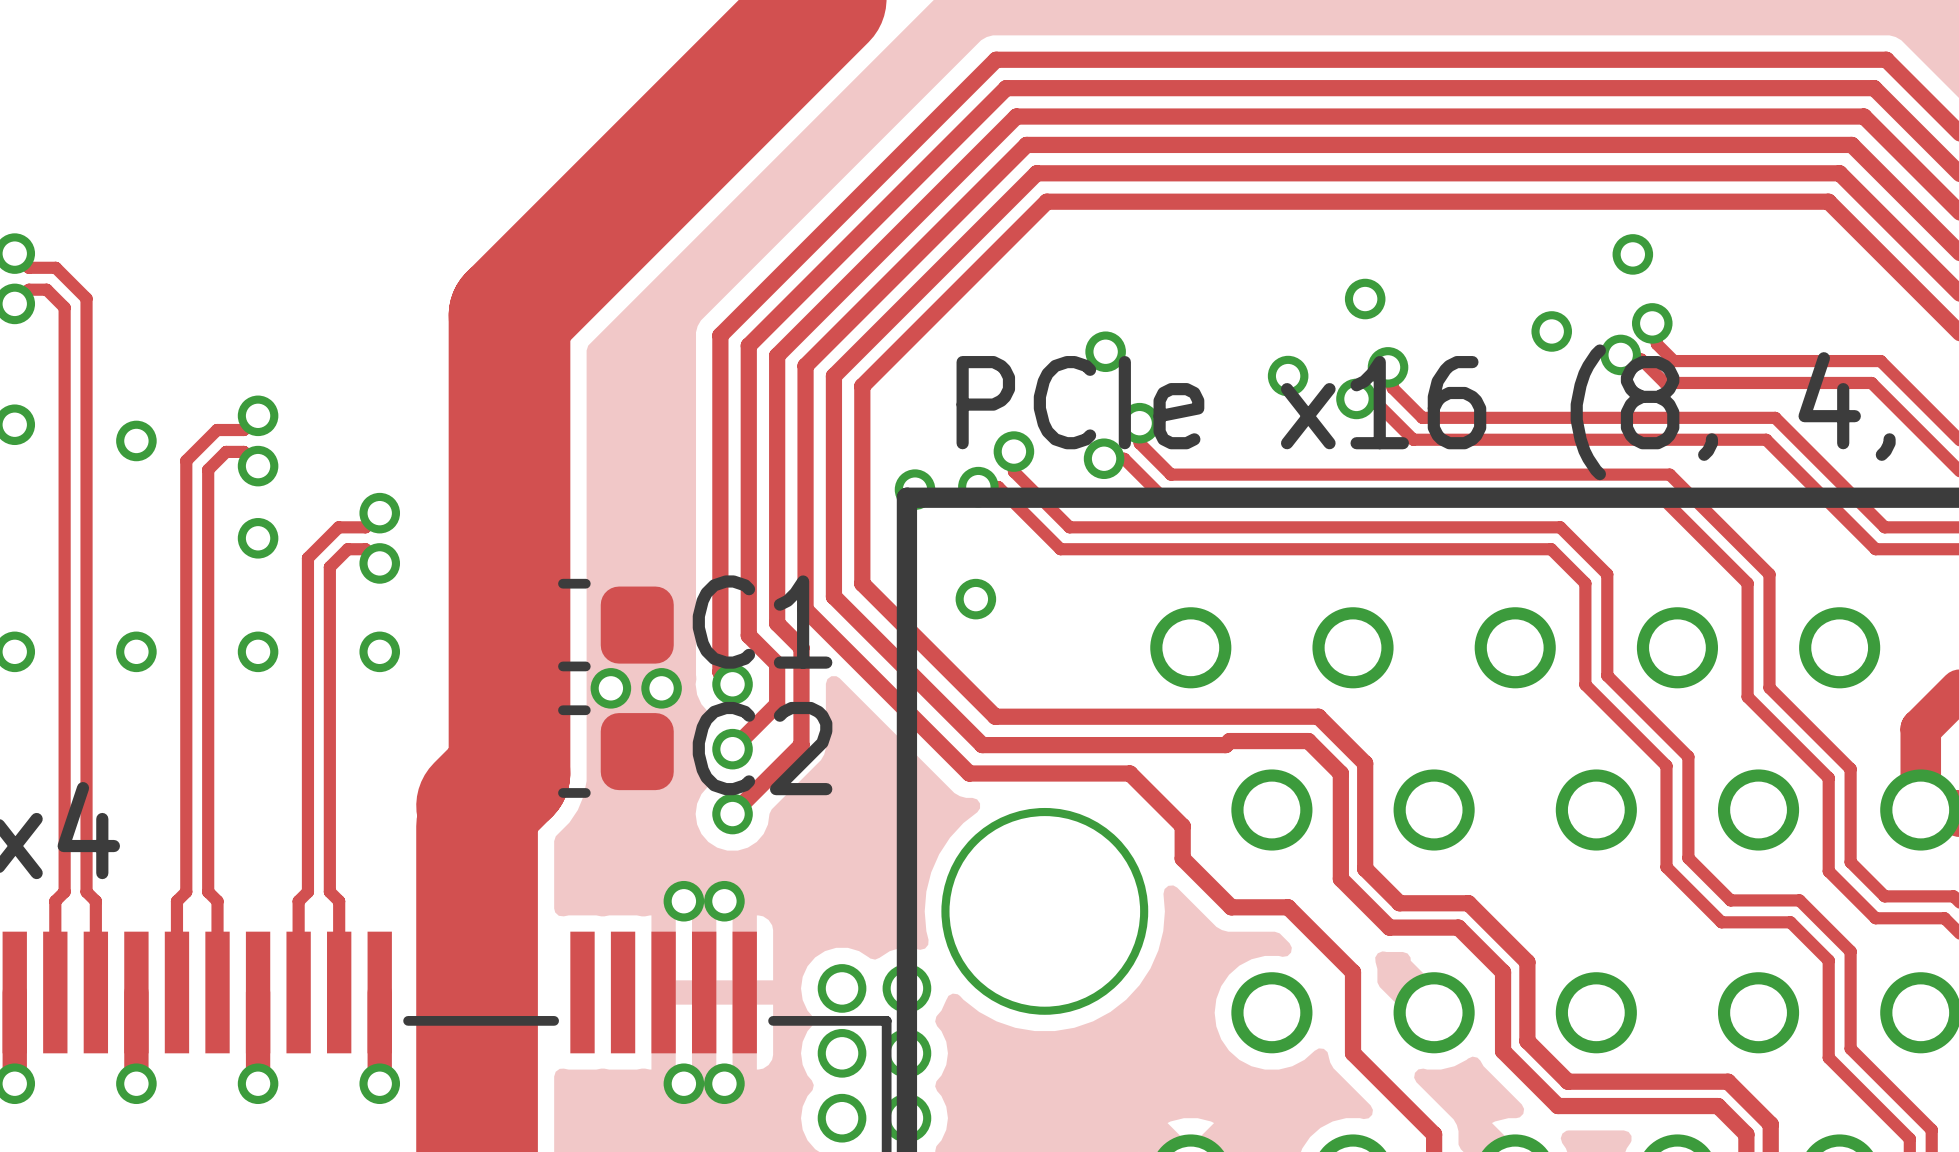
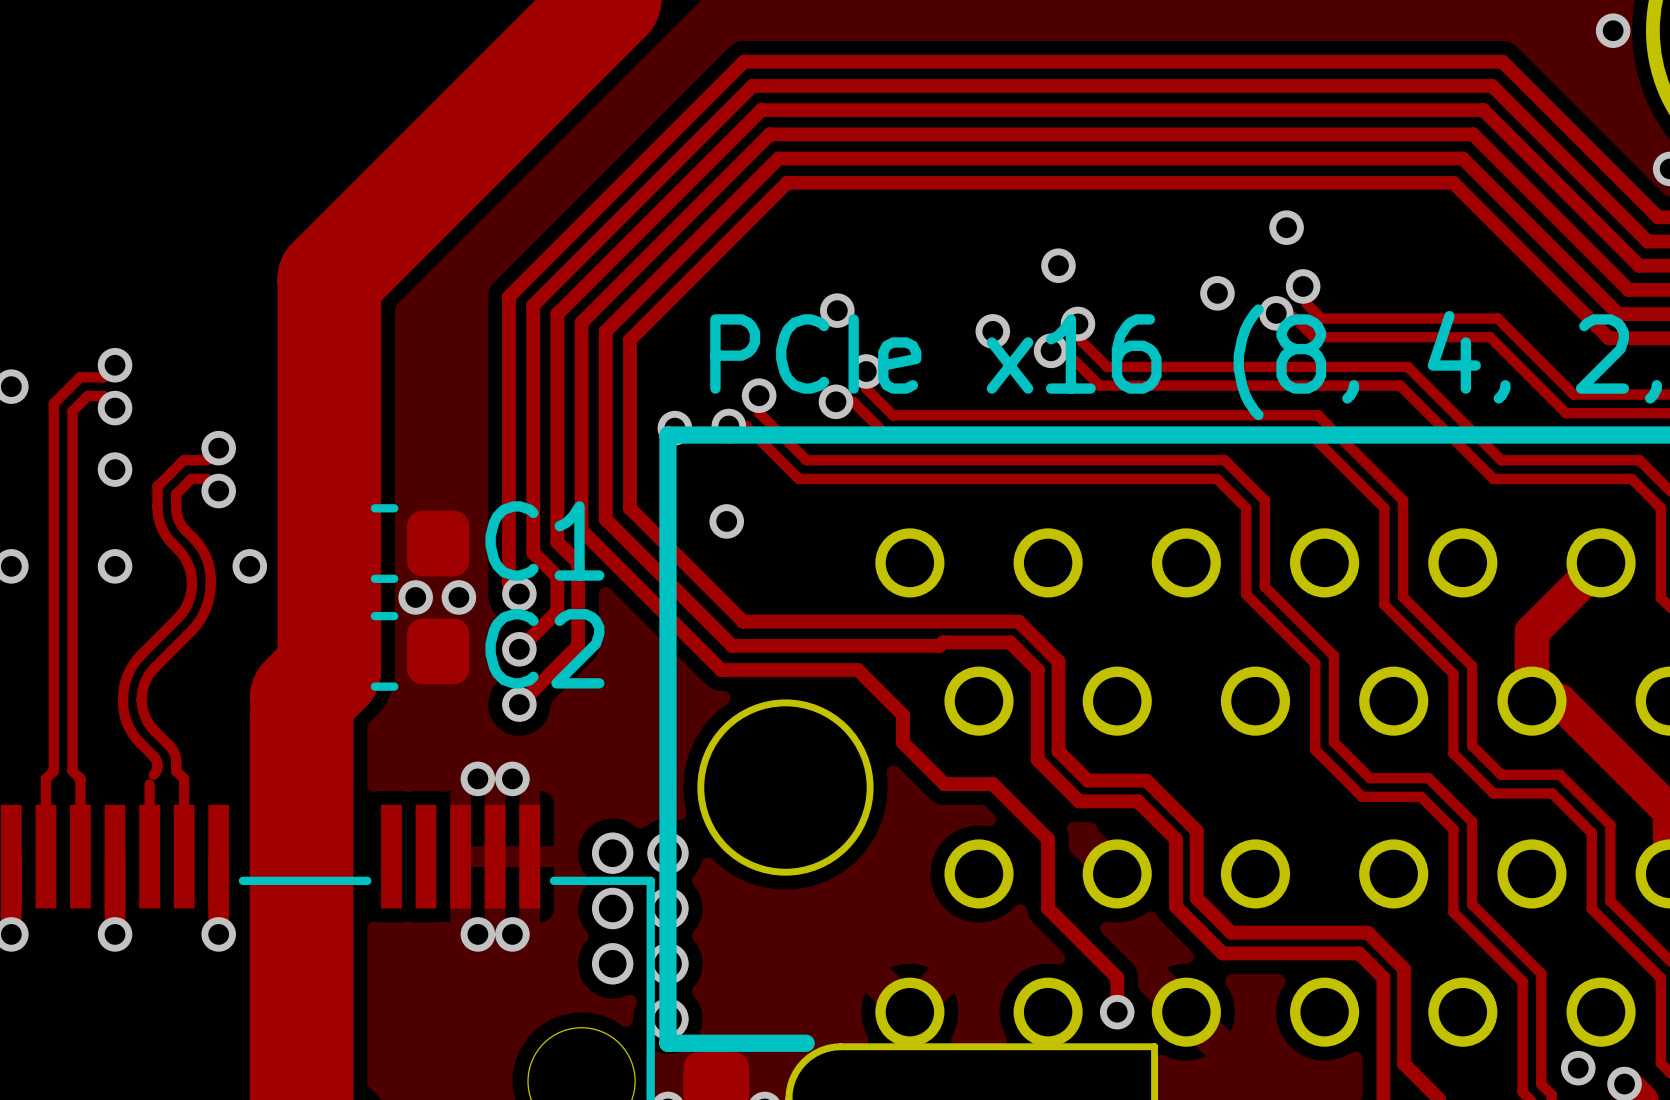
track: (307, 582) (307, 891) (298, 901) (298, 907) -> (157, 507) (163, 531) (181, 553) (188, 564) (191, 577) (191, 590) (188, 602) (181, 613) (133, 664) (125, 680) (122, 699)
track: (329, 582) (329, 881) -> (176, 507) (181, 525) (203, 552) (208, 562) (210, 580) (208, 601) (201, 617) (190, 631) (150, 672) (145, 682) (142, 693) (142, 705) (147, 721) (171, 748) (176, 761)
via position: (379, 651) -> (249, 566)
track: none -> (122, 701) (124, 712) (129, 729) (156, 760) (157, 767) (153, 774)

